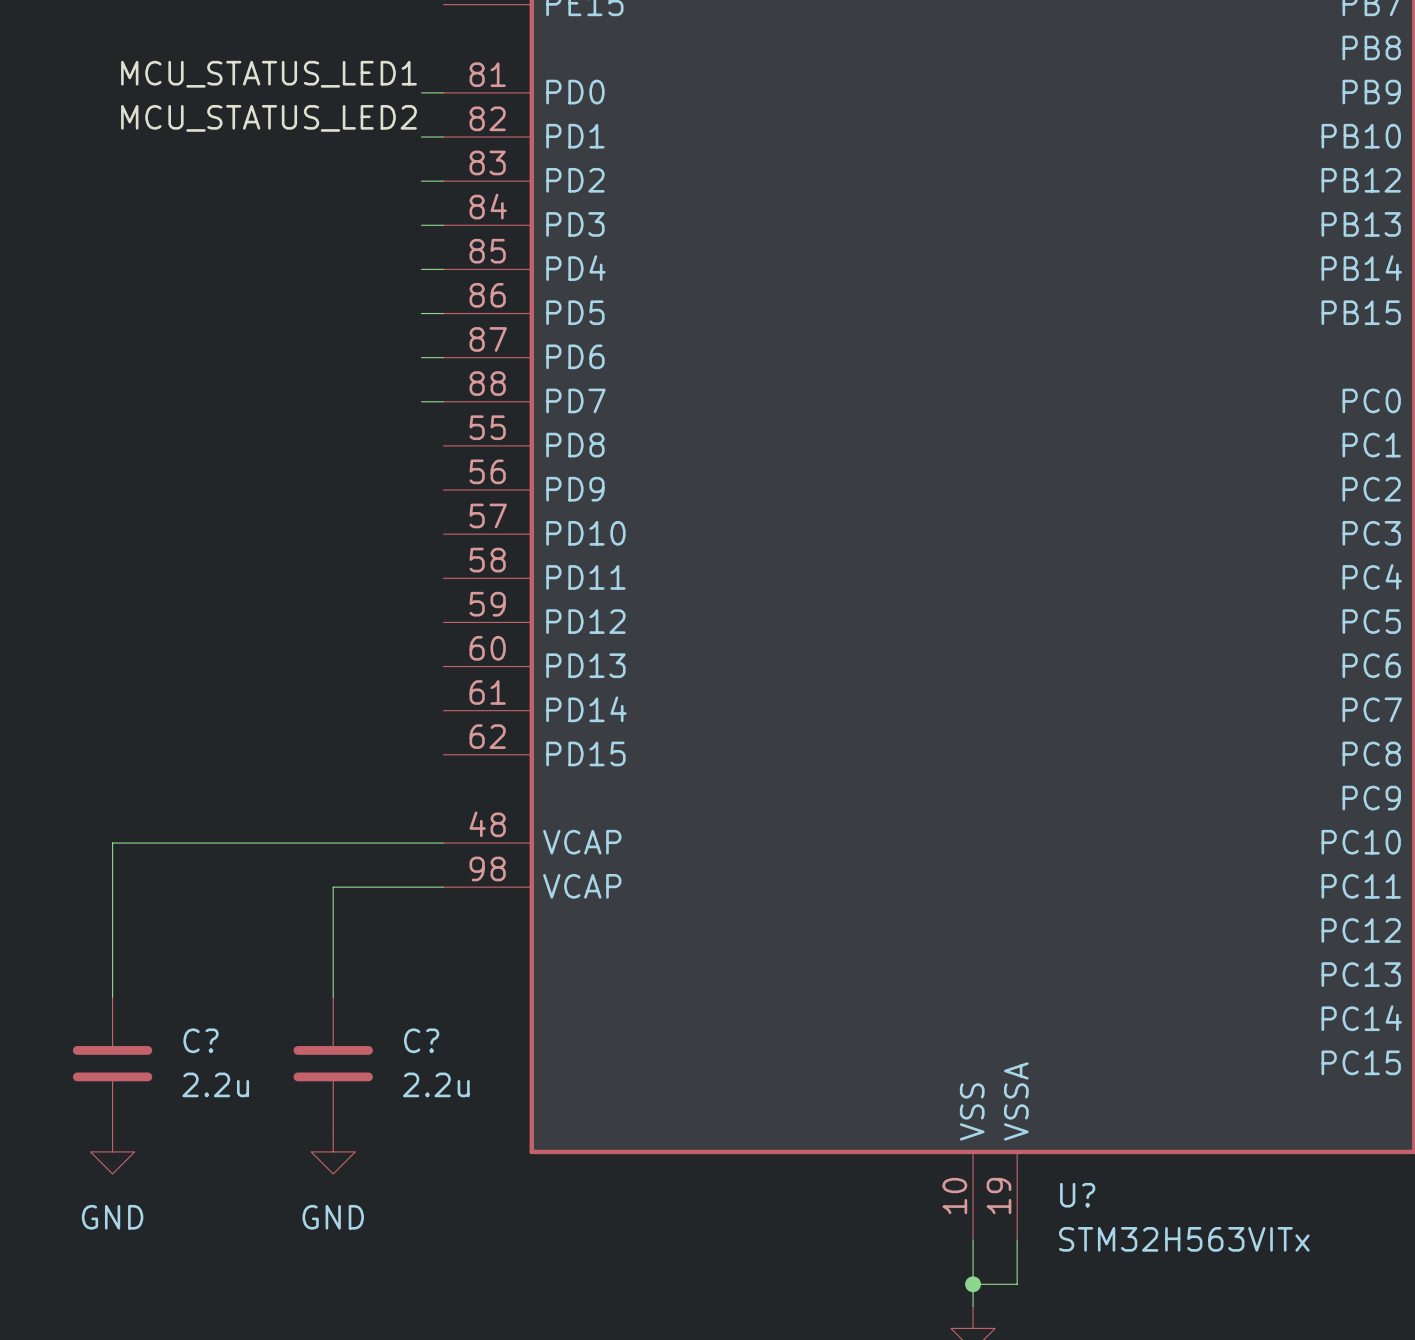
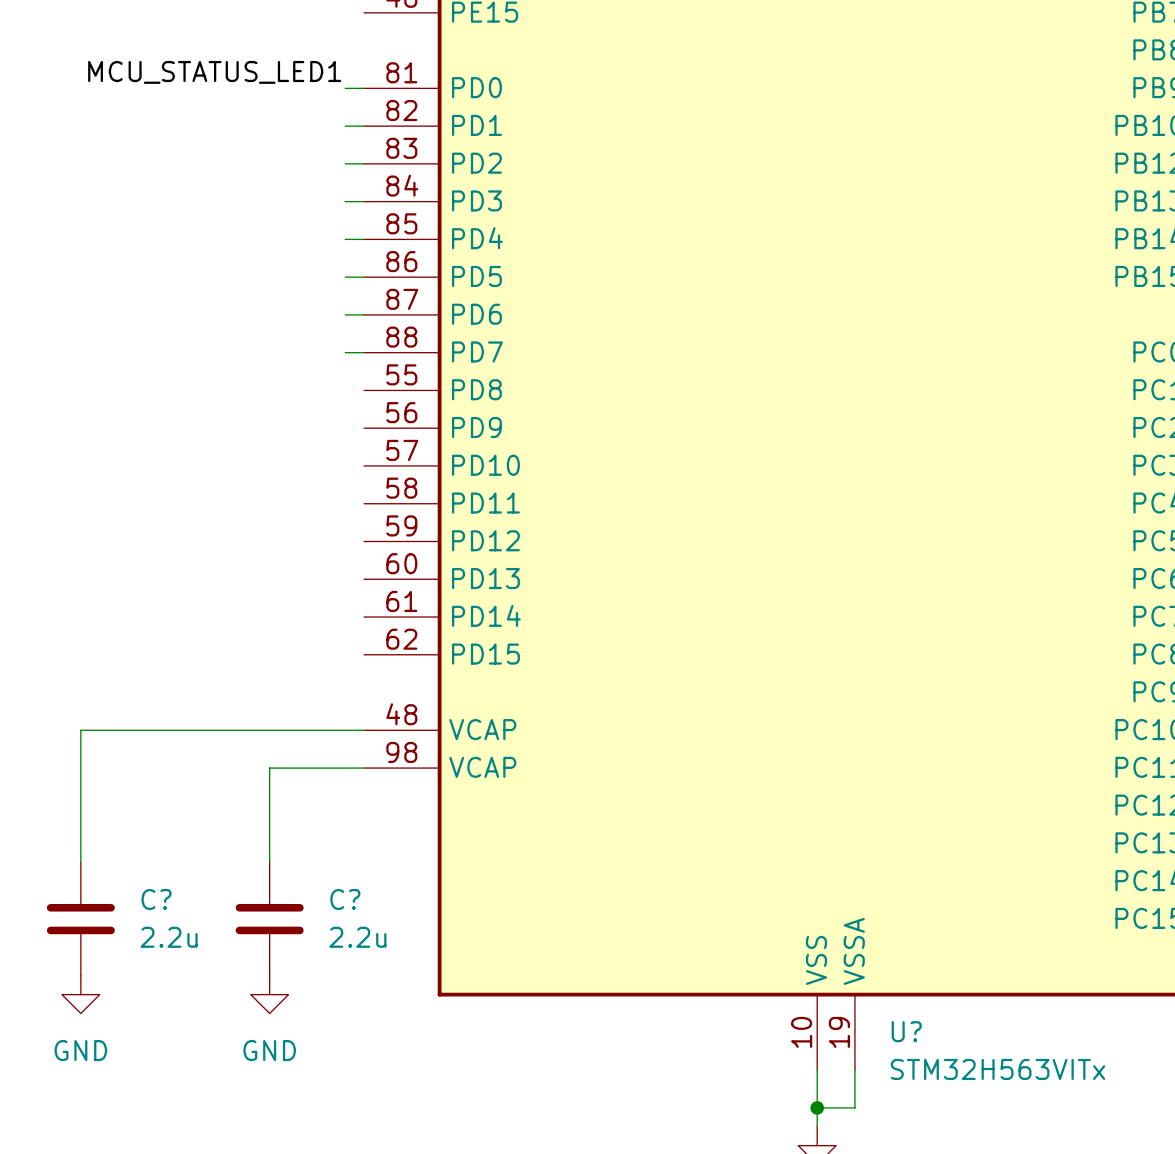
label: MCU_STATUS_LED2 (268, 118) -> none

